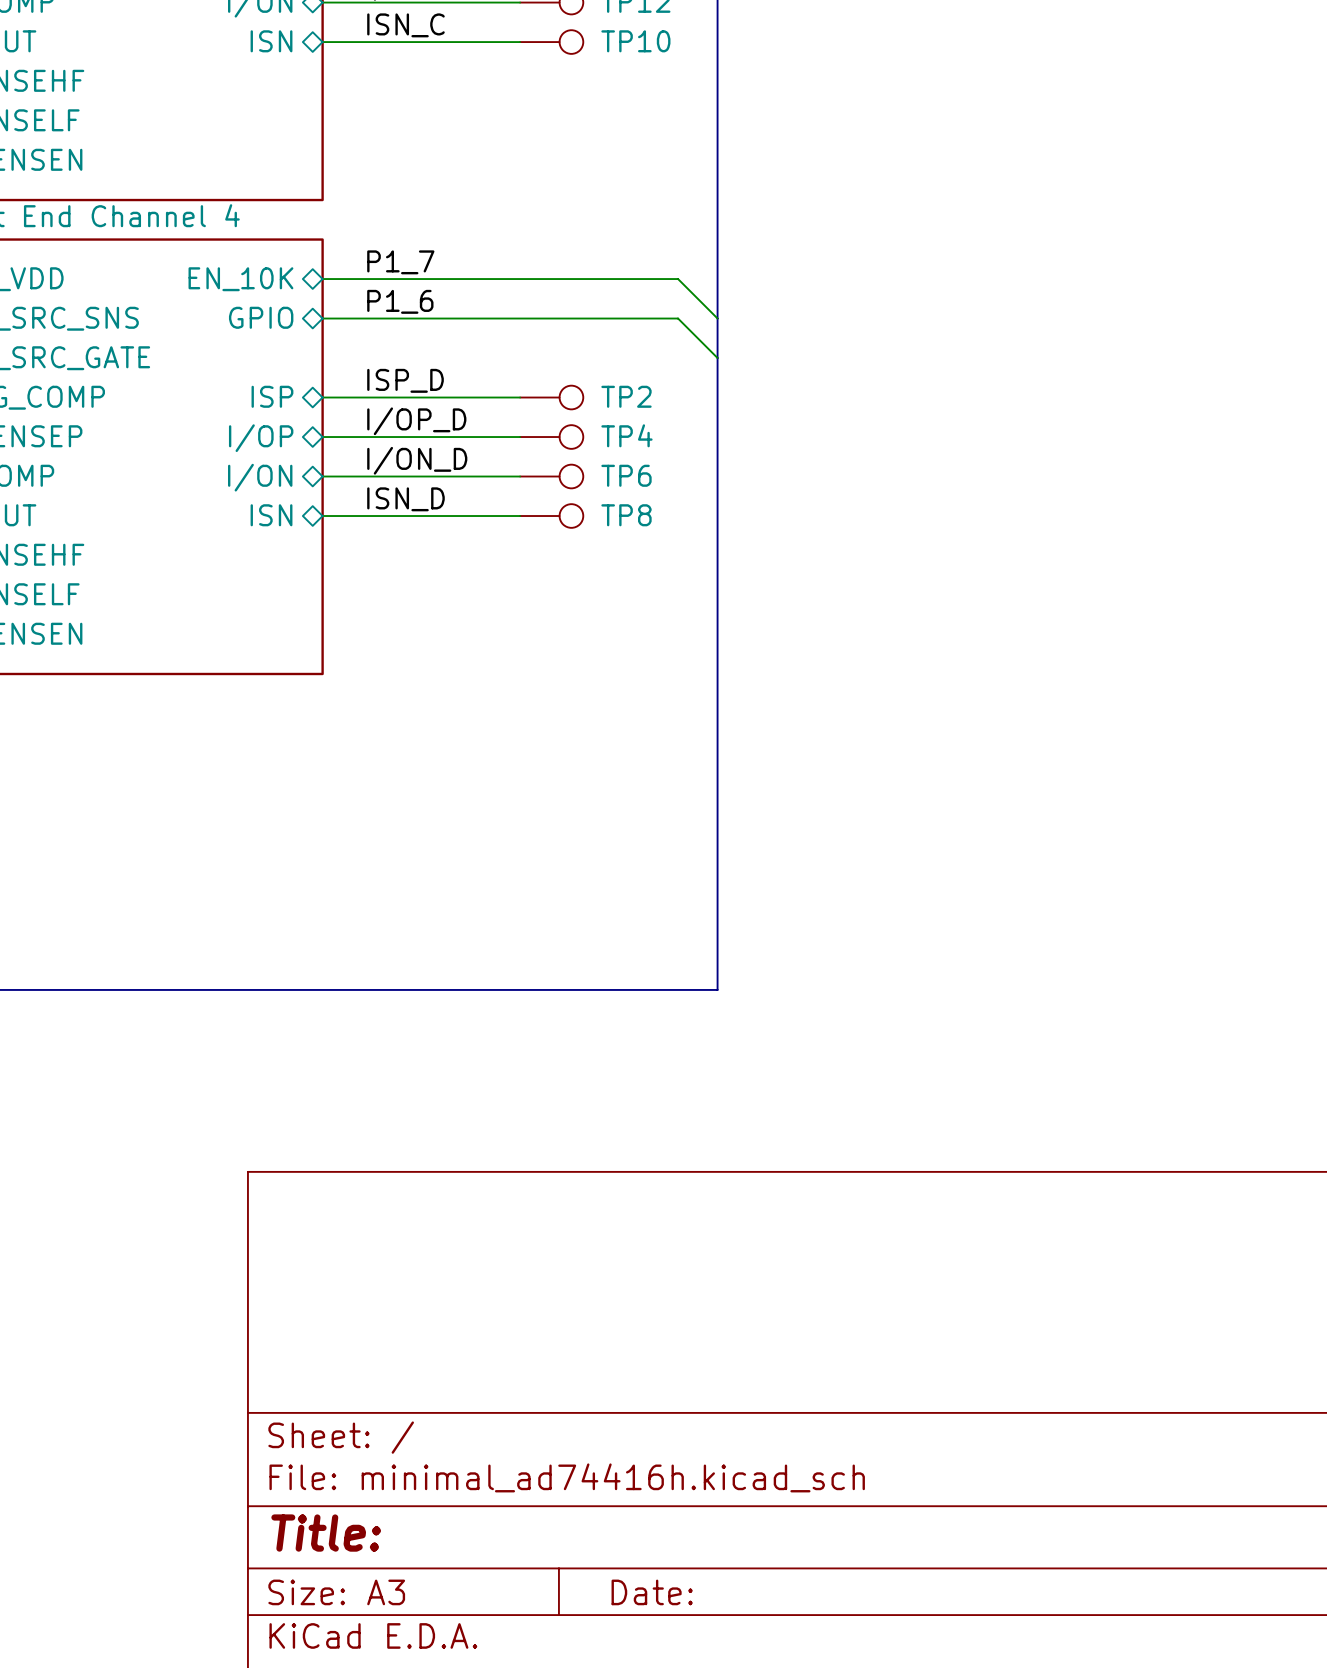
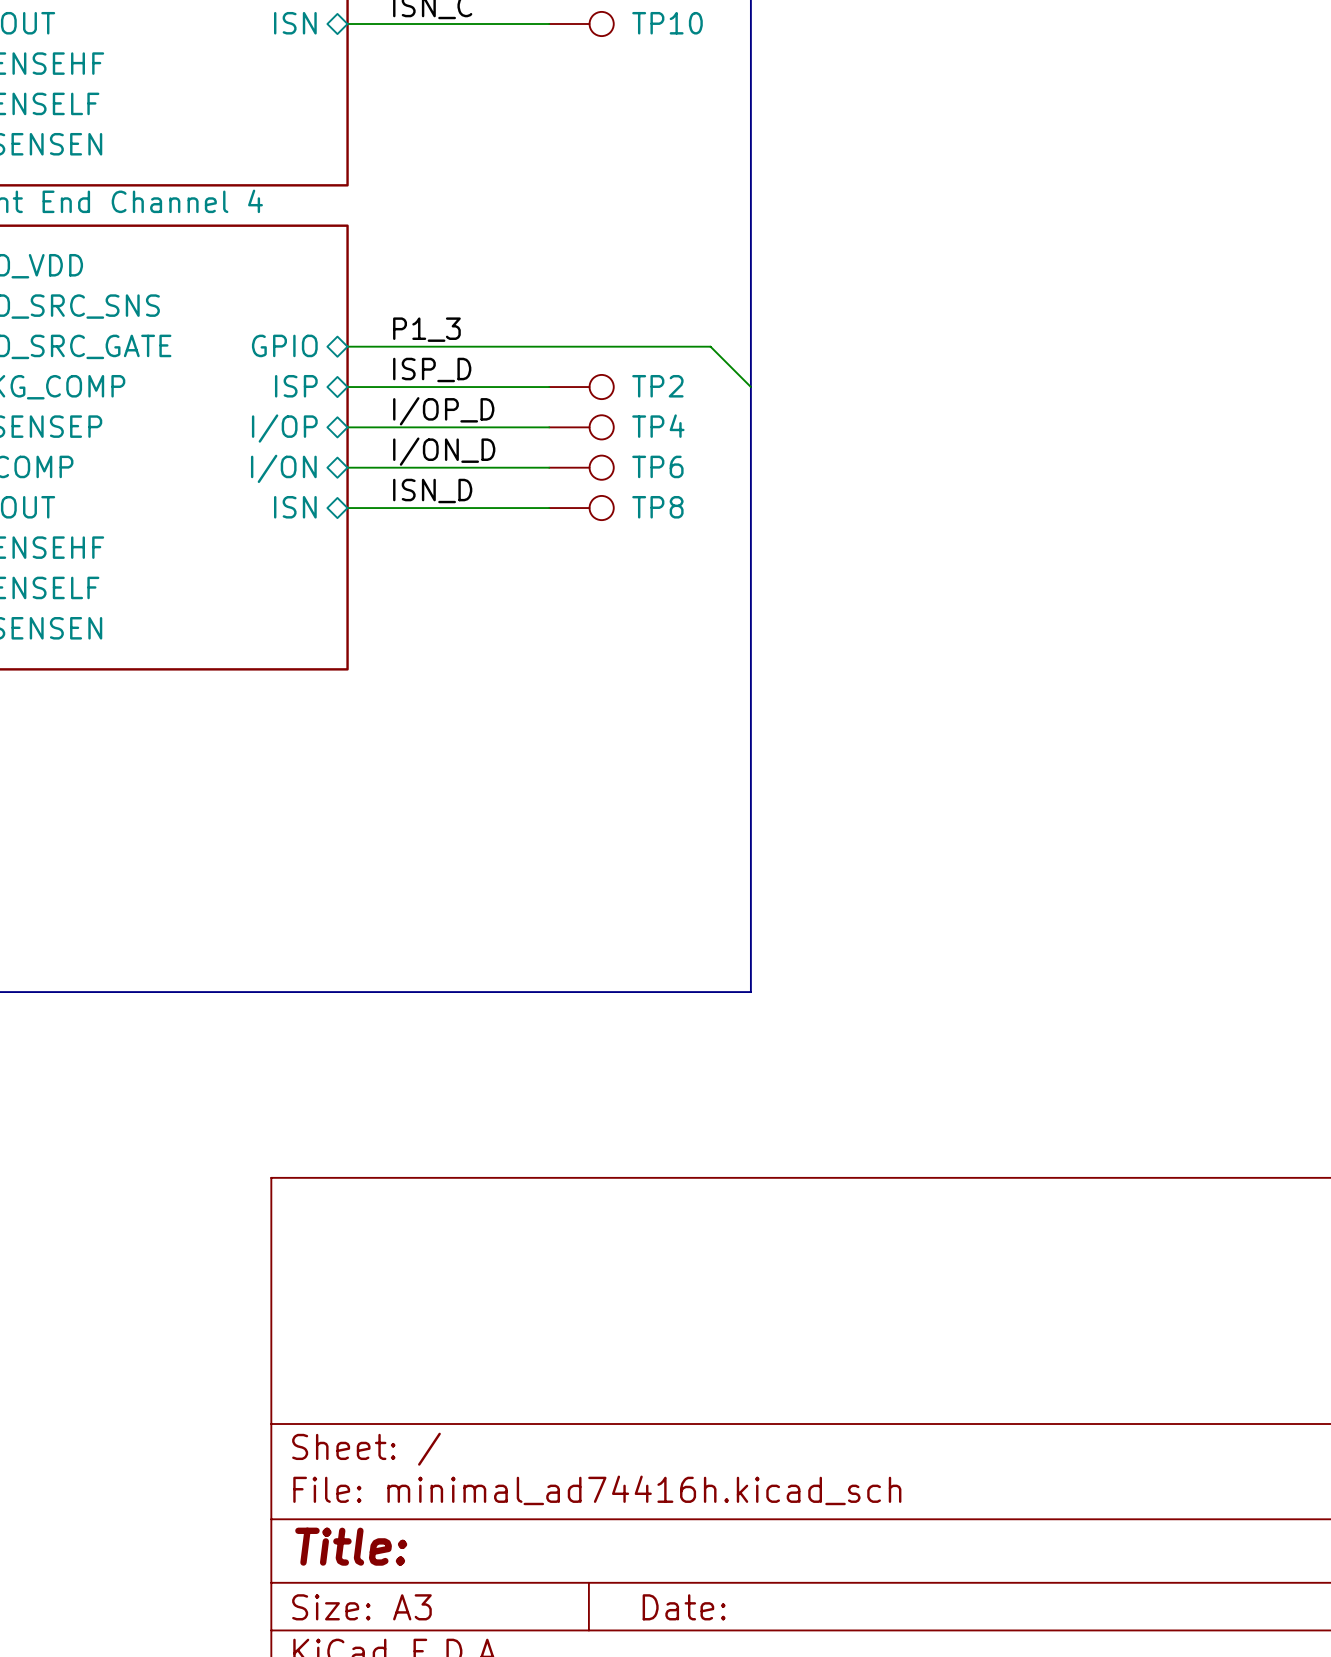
label: P1_7 (400, 262) -> none
sheet pin: EN_10K (240, 279) -> none
wire: (322, 279) (678, 279) (717, 318) -> none
label: P1_6 (400, 301) -> P1_3 (426, 329)
sheet pin position: GPIO (261, 317) -> GPIO (284, 345)
wire: (322, 318) (678, 318) (717, 358) -> (347, 346) (710, 346) (750, 387)

